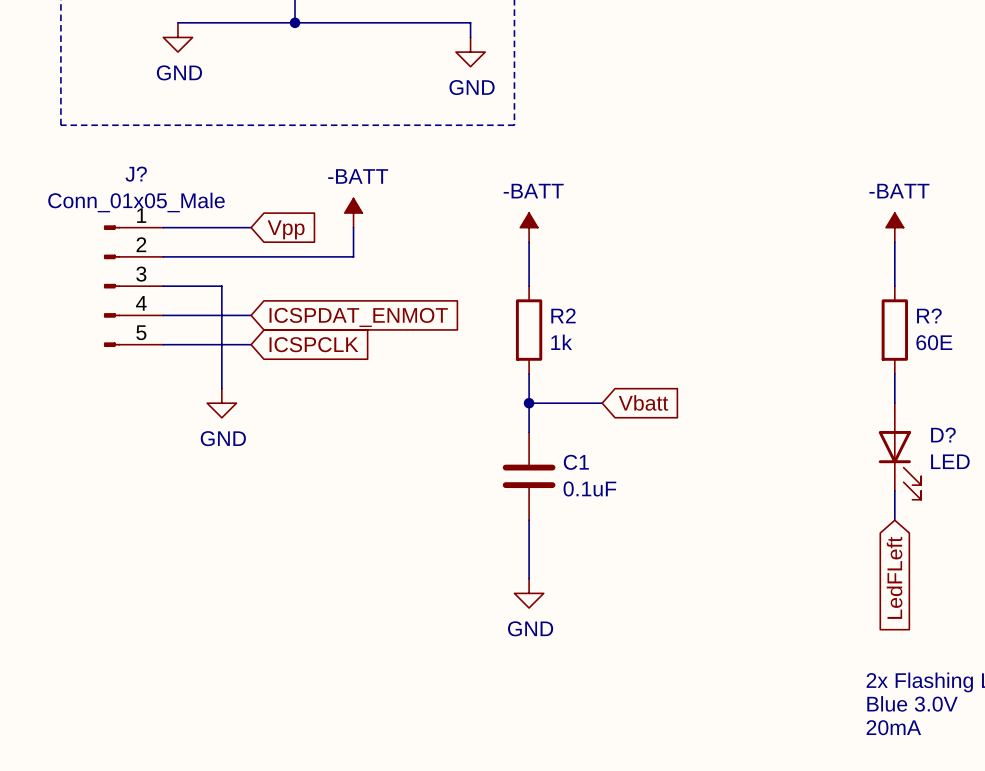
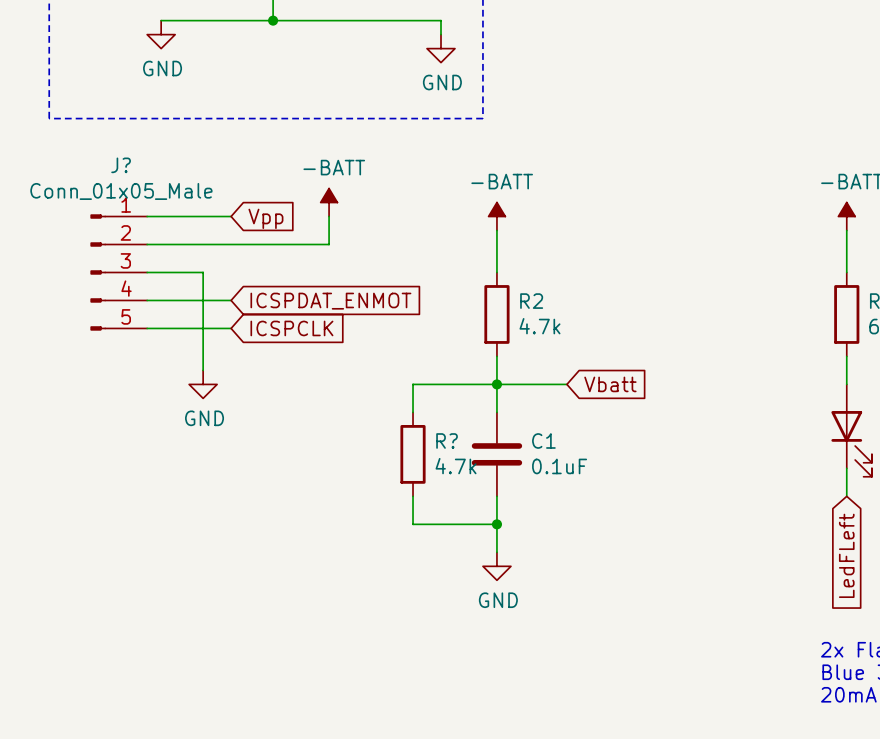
R2 value: 1k (561, 342) -> 4.7k (539, 326)
wire: none -> (496, 384) (413, 384) (413, 412)
R?: none -> 4.7k (413, 454)
wire: none -> (413, 496) (413, 524) (496, 524)
junction: none -> (496, 524)

